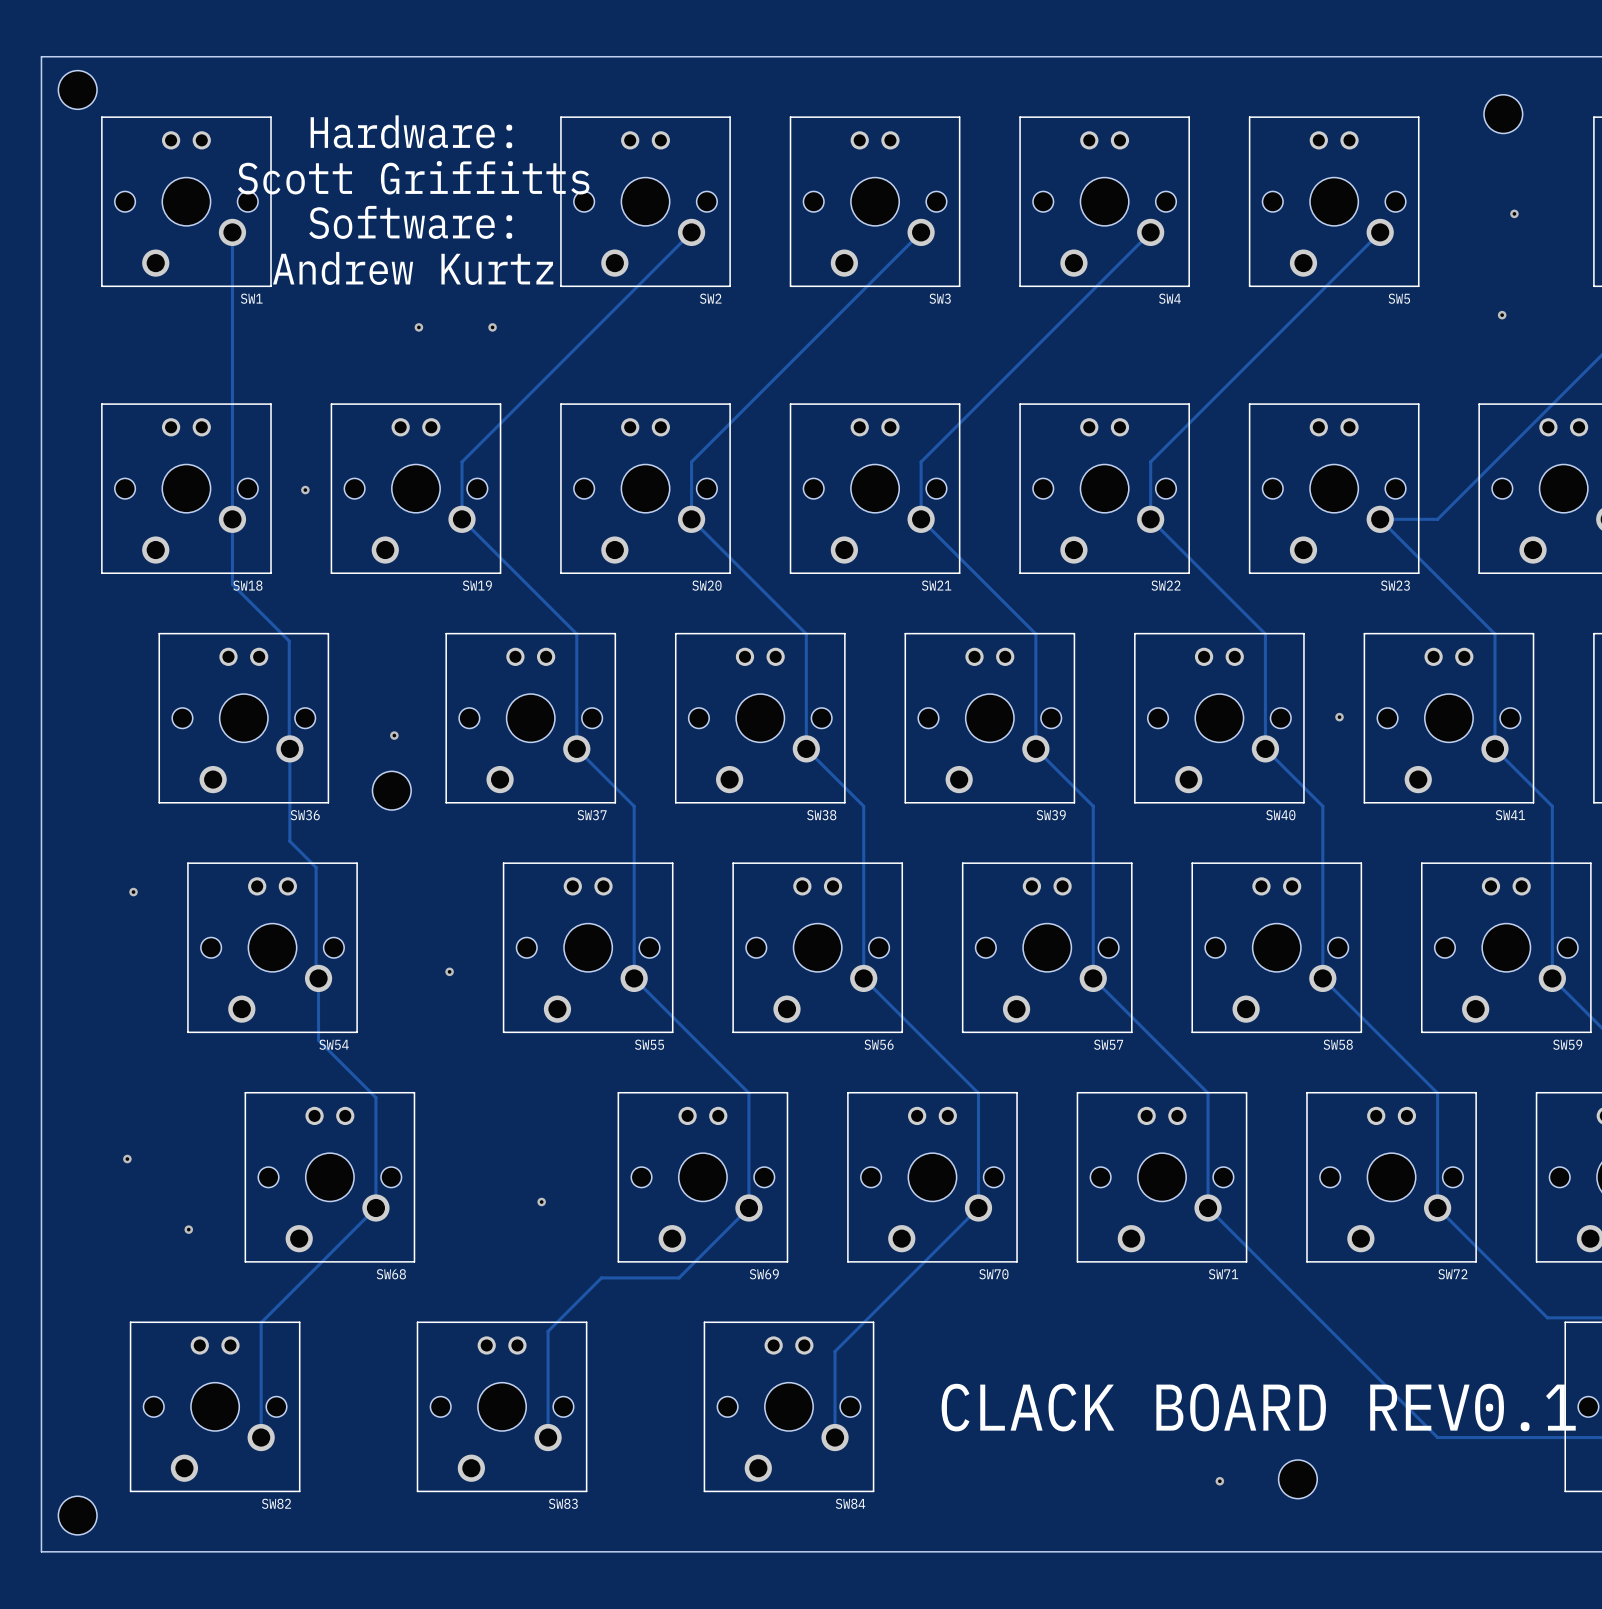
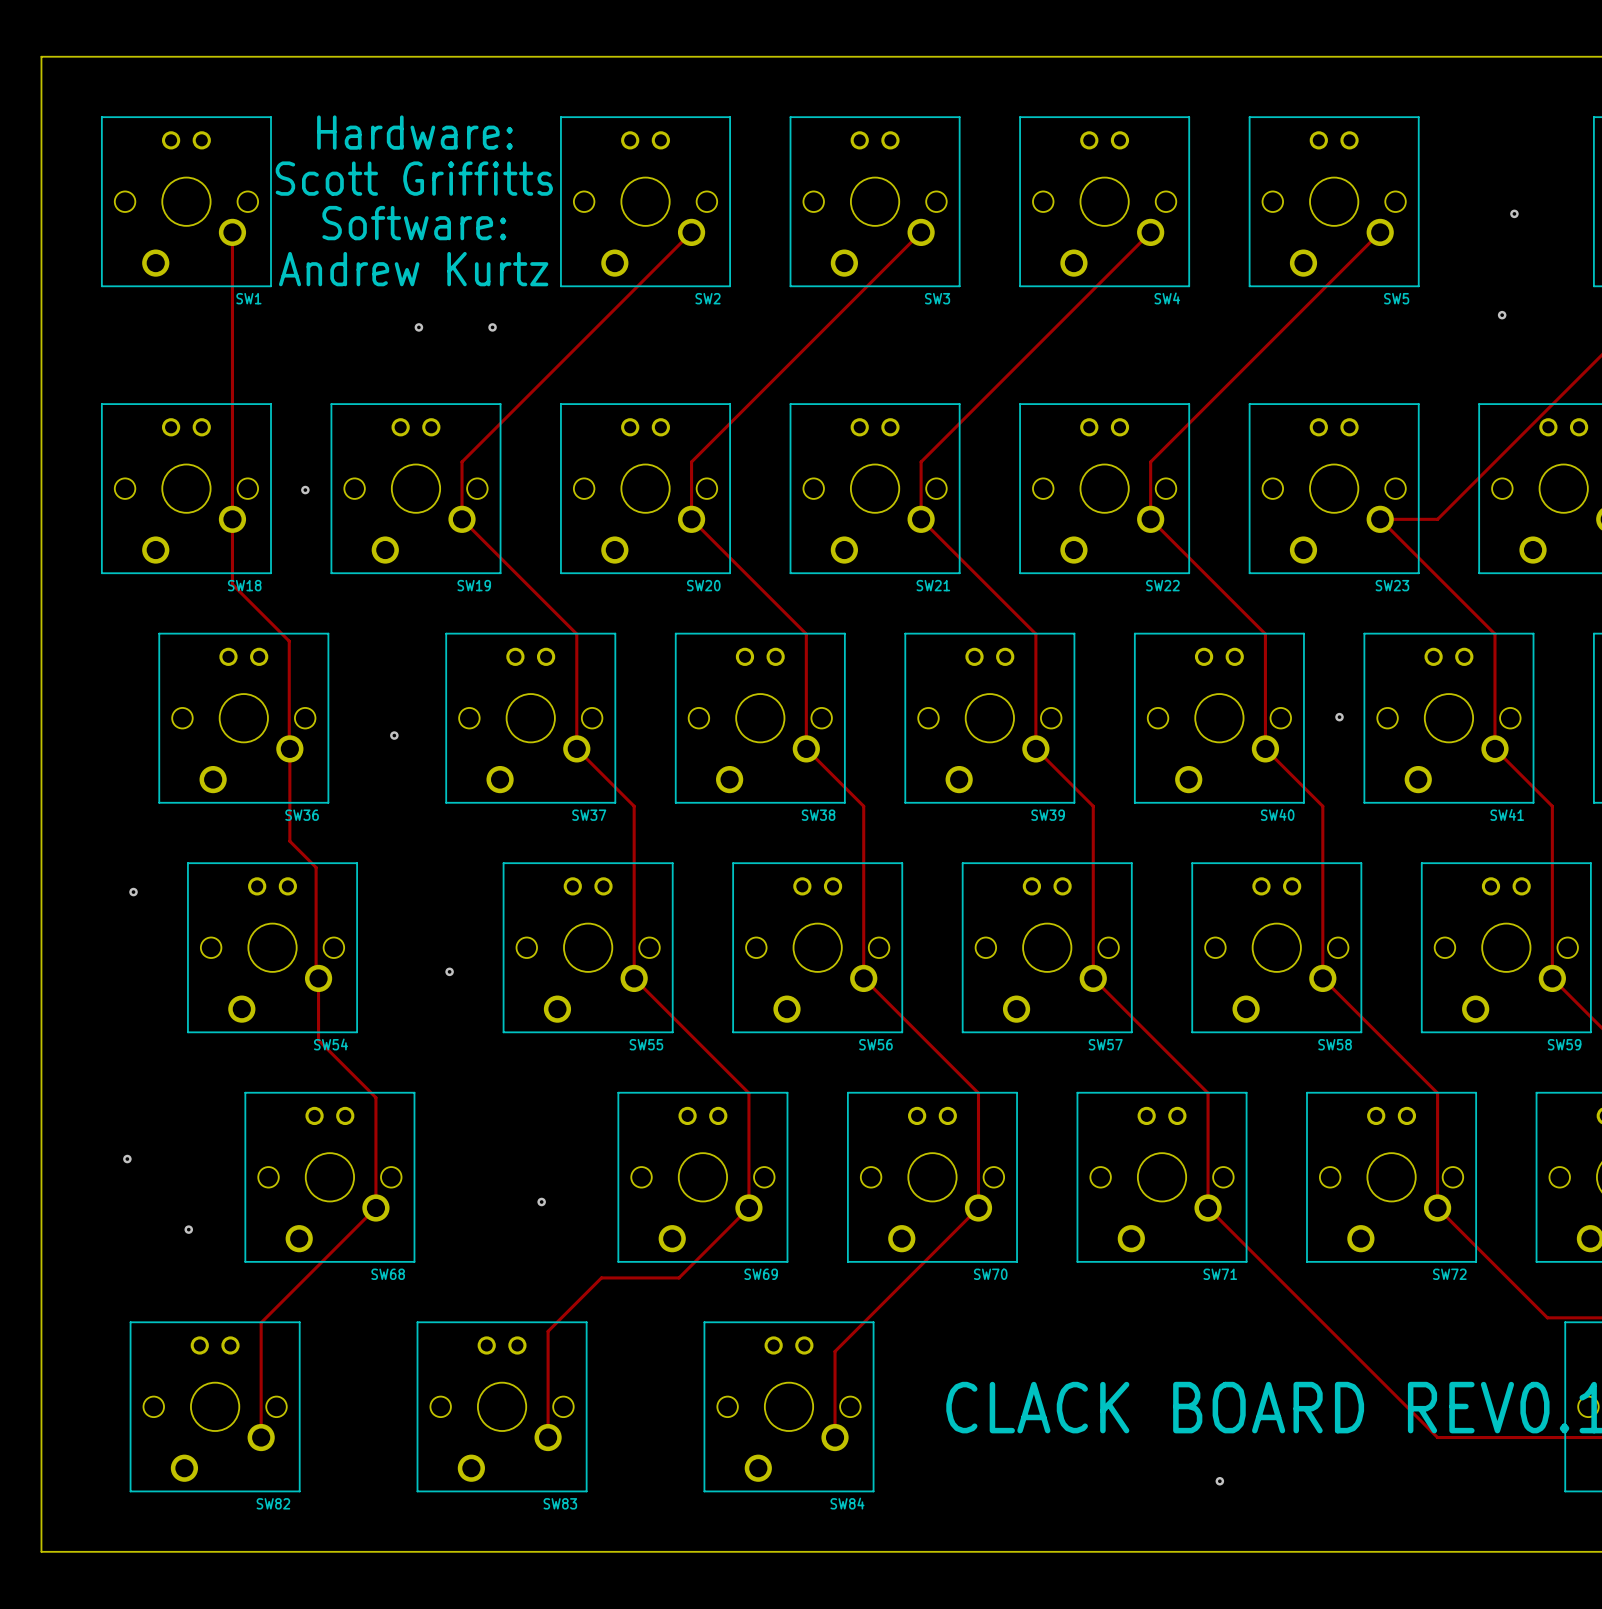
hole: (77, 89) -> none
hole: (1503, 114) -> none
hole: (391, 790) -> none
hole: (1297, 1479) -> none
hole: (77, 1515) -> none

